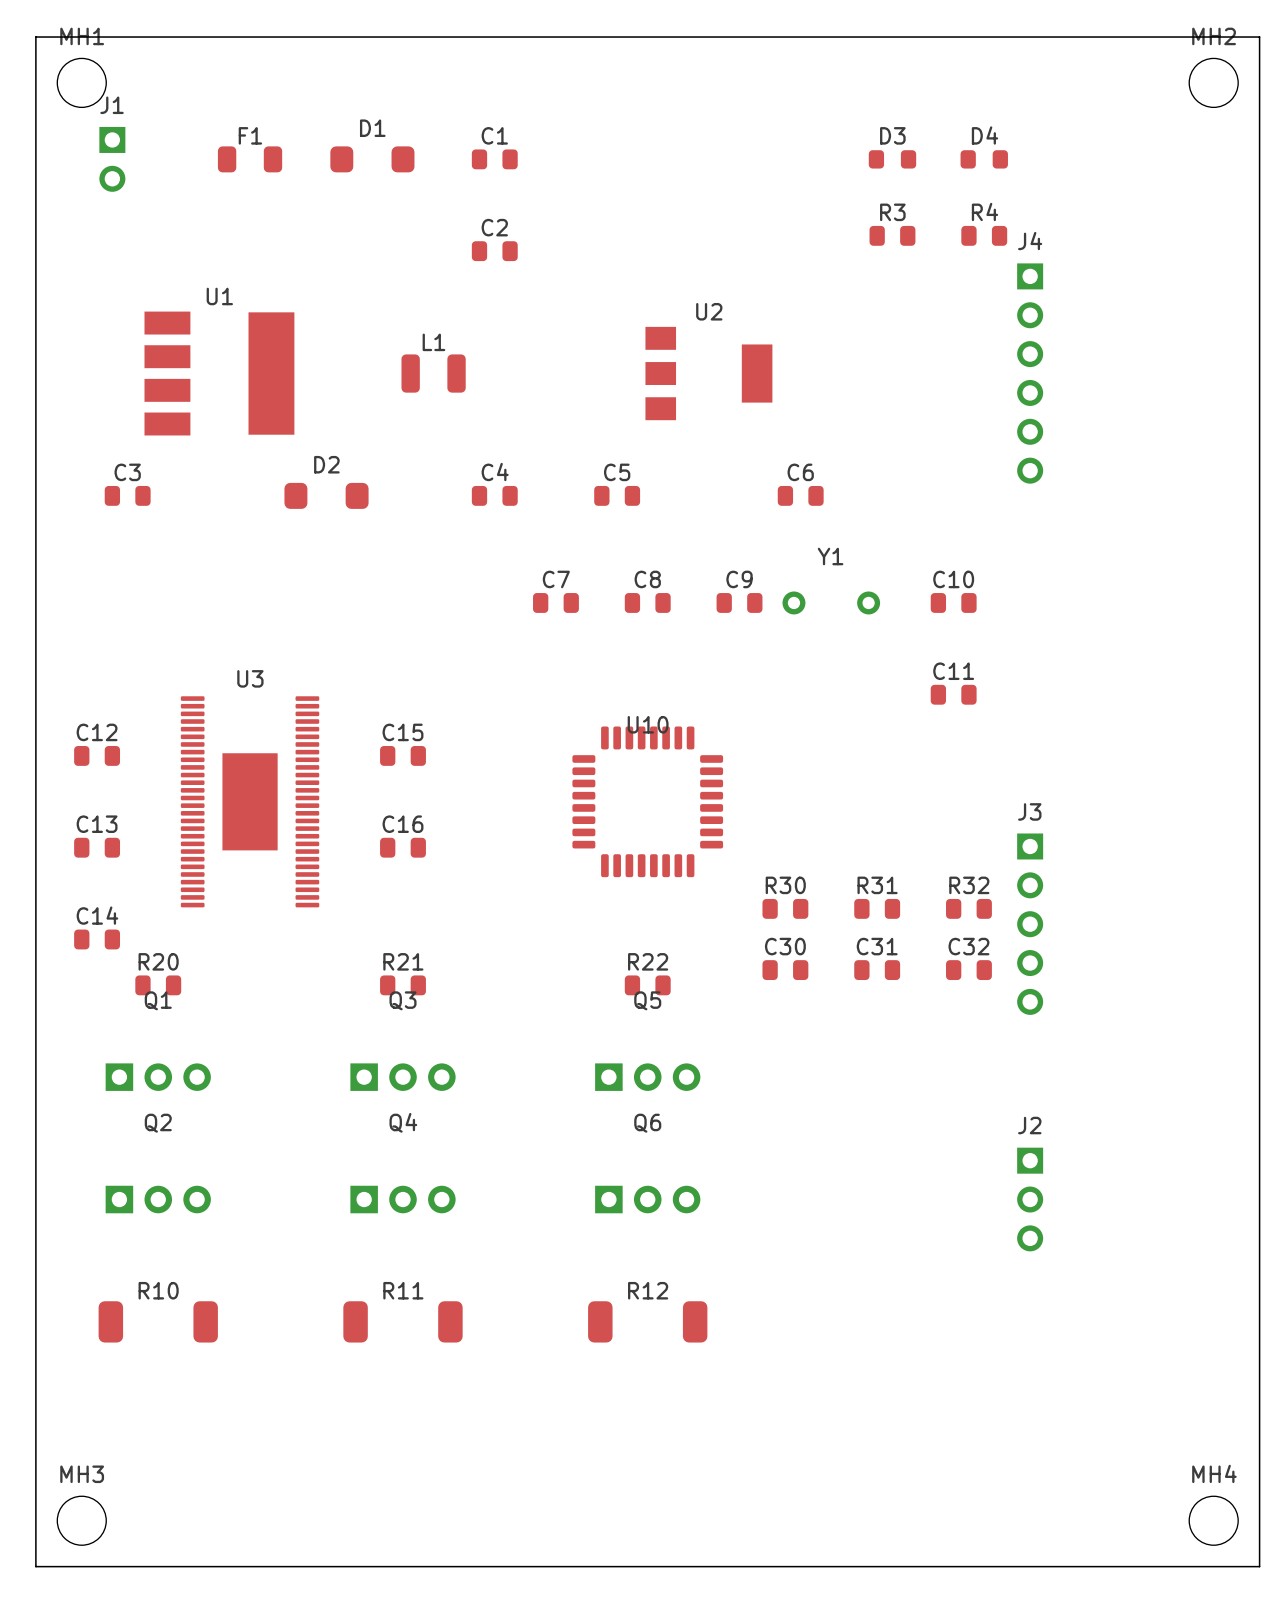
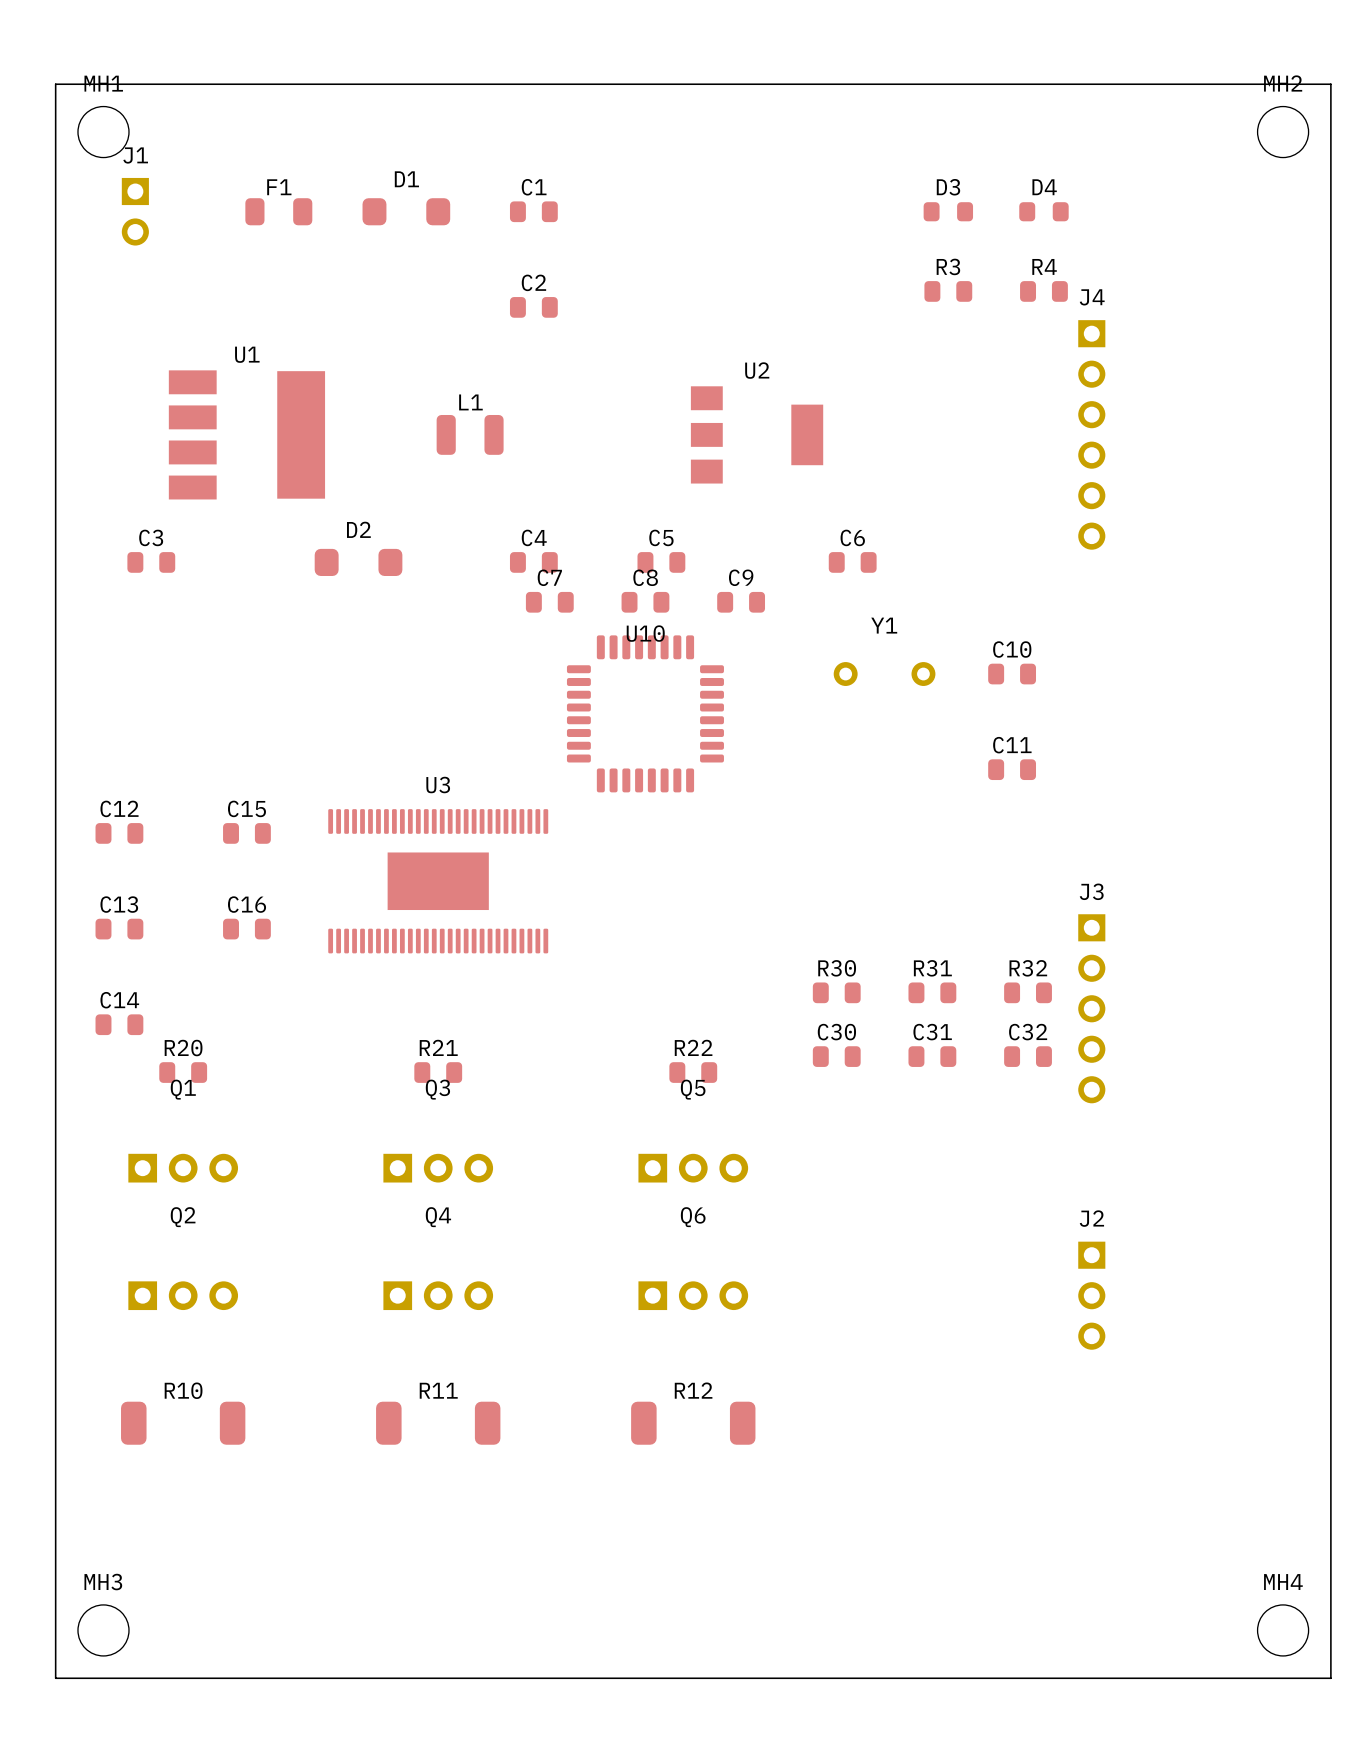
C7 position: (555, 602) -> (549, 602)
C8 position: (647, 602) -> (645, 602)
C9 position: (739, 602) -> (741, 602)
C15 position: (403, 755) -> (246, 833)
U3 rotation: 0° (250, 801) -> 90° clockwise (438, 881)
U3 position: (250, 801) -> (438, 881)
U10 position: (647, 801) -> (645, 713)
C16 position: (403, 847) -> (246, 929)

